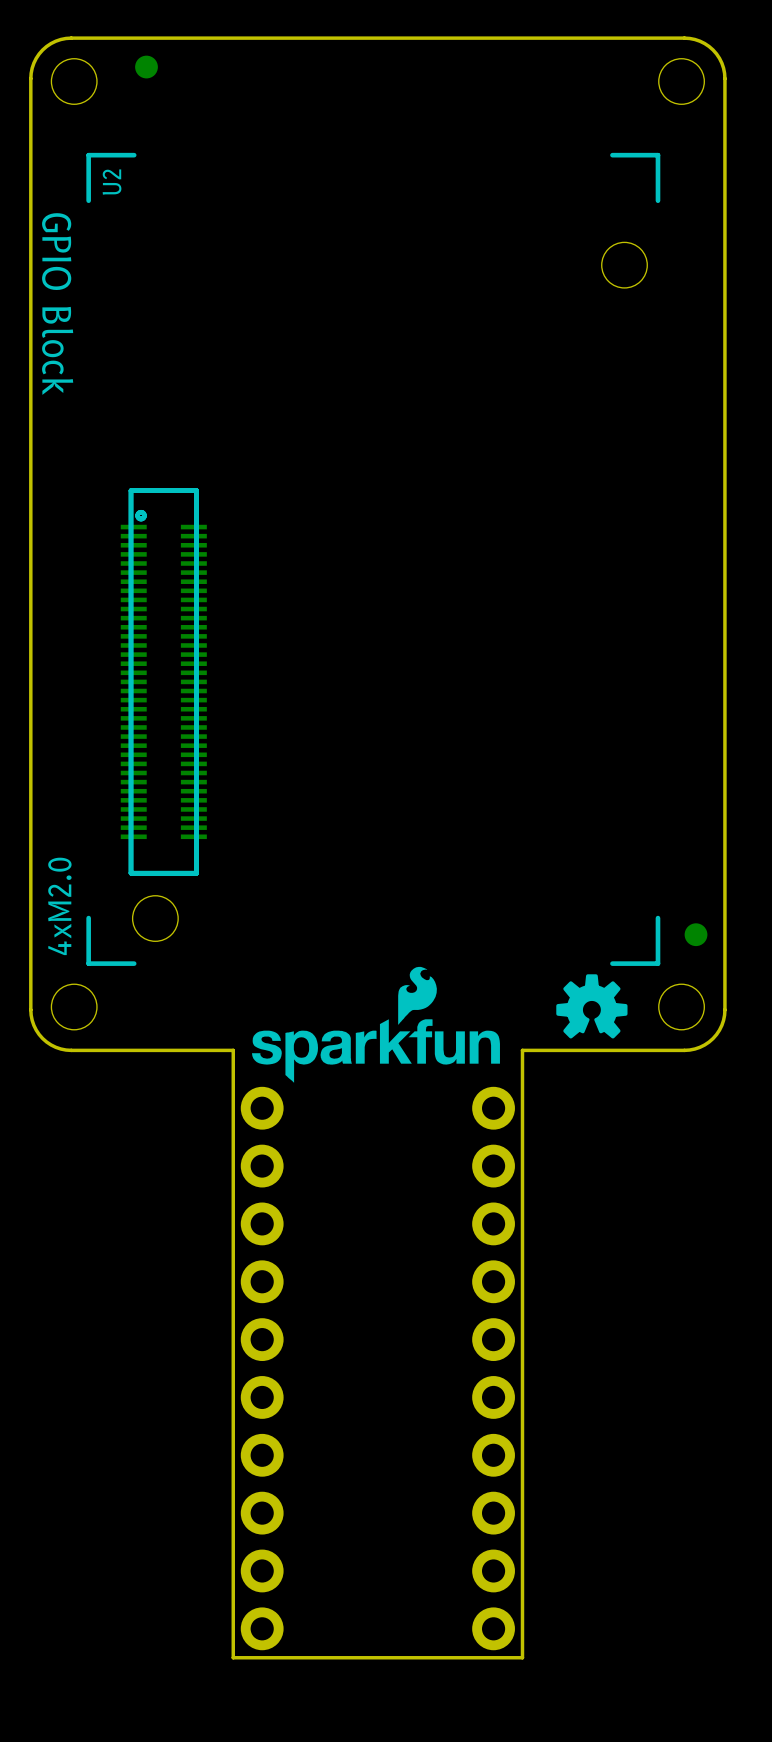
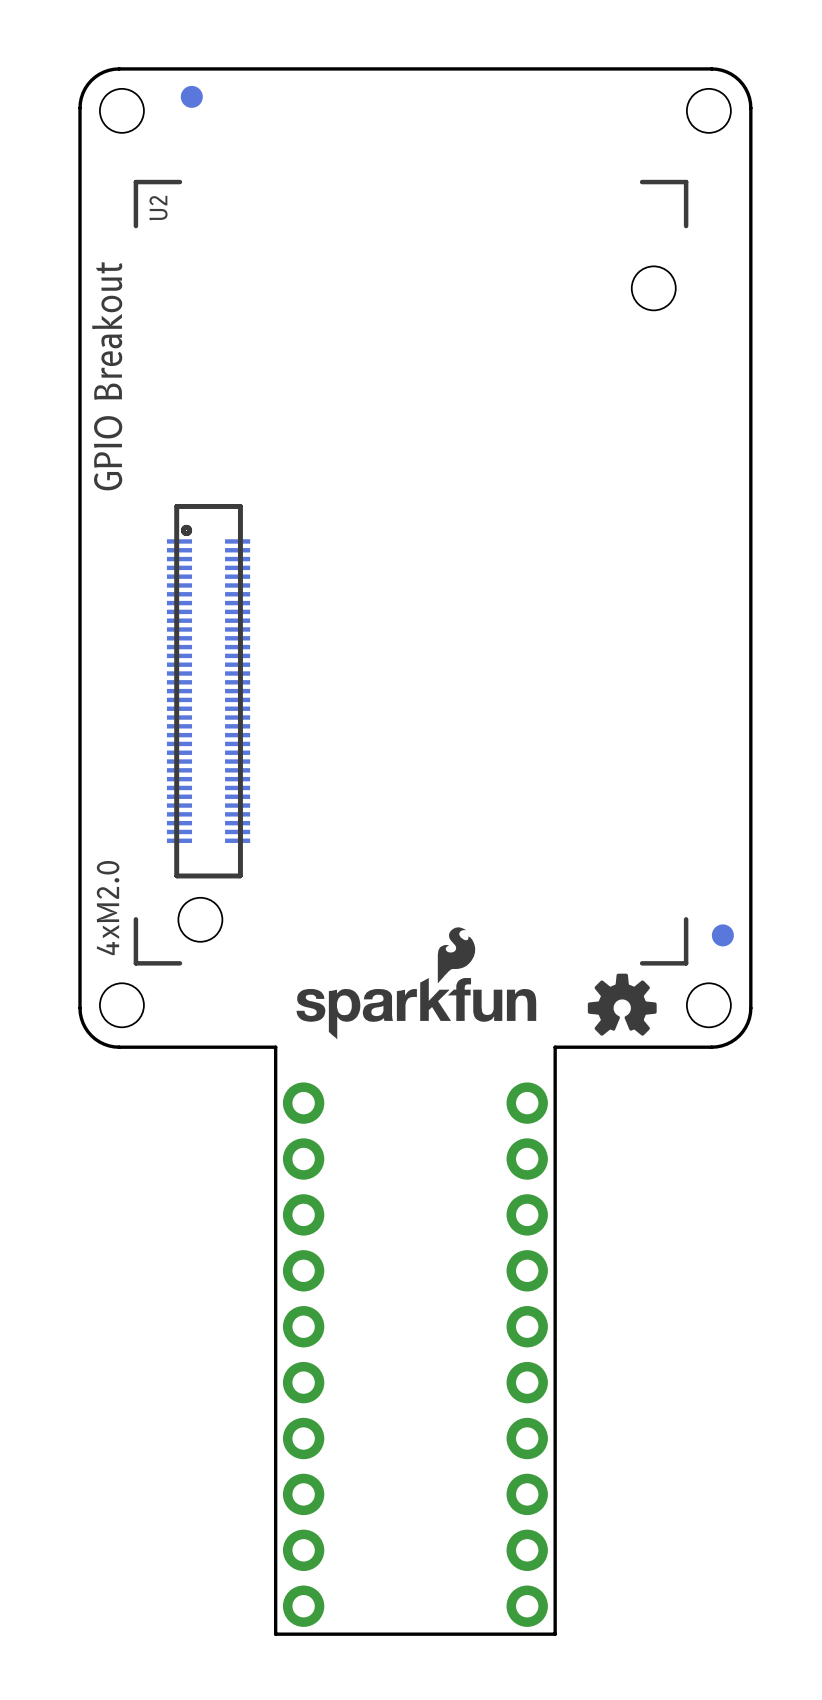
text: GPIO Block (57, 304) -> GPIO Breakout (107, 376)
drawing position: (375, 1024) -> (416, 983)

